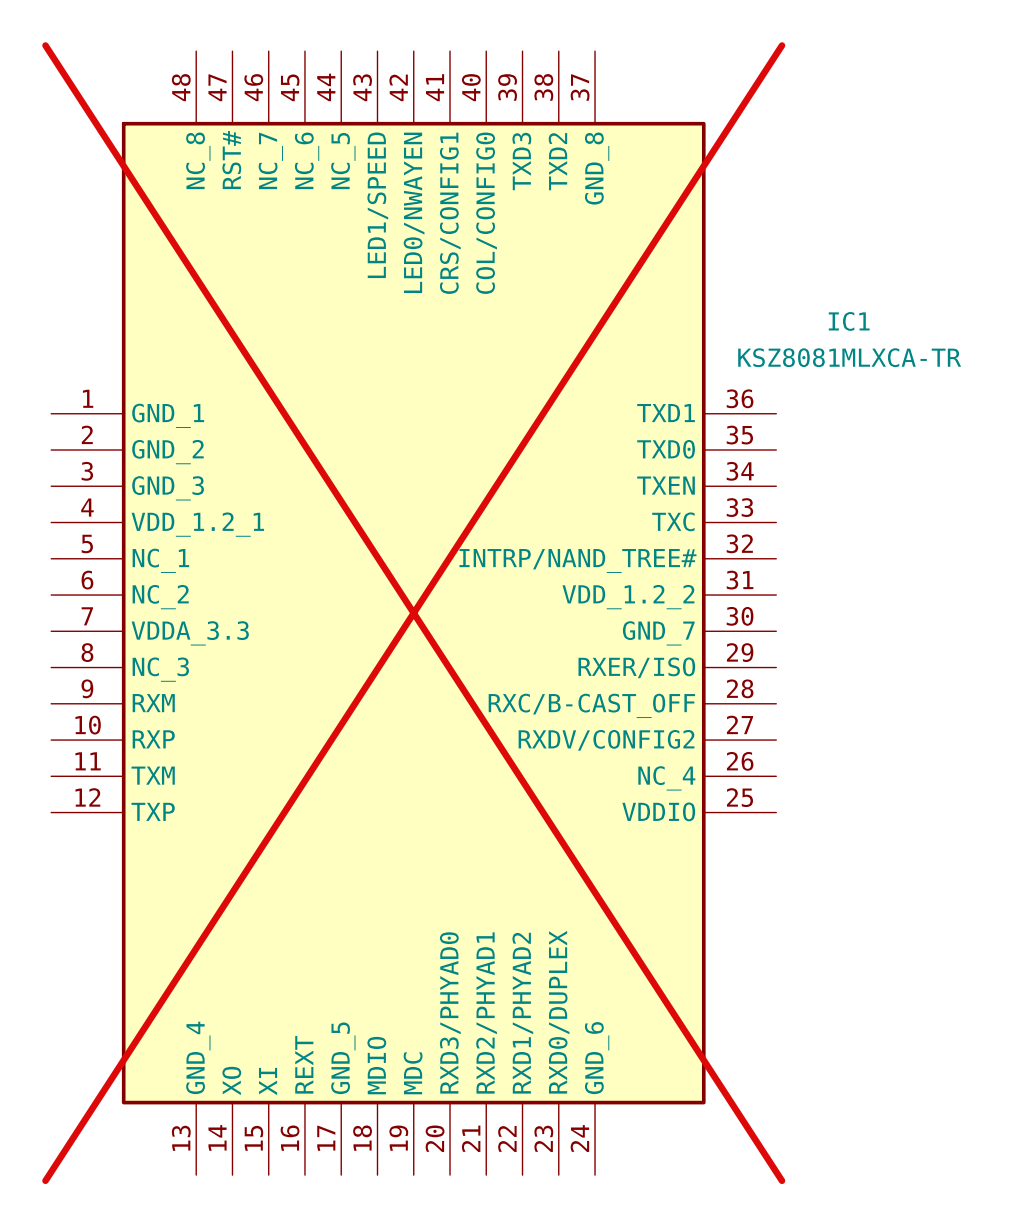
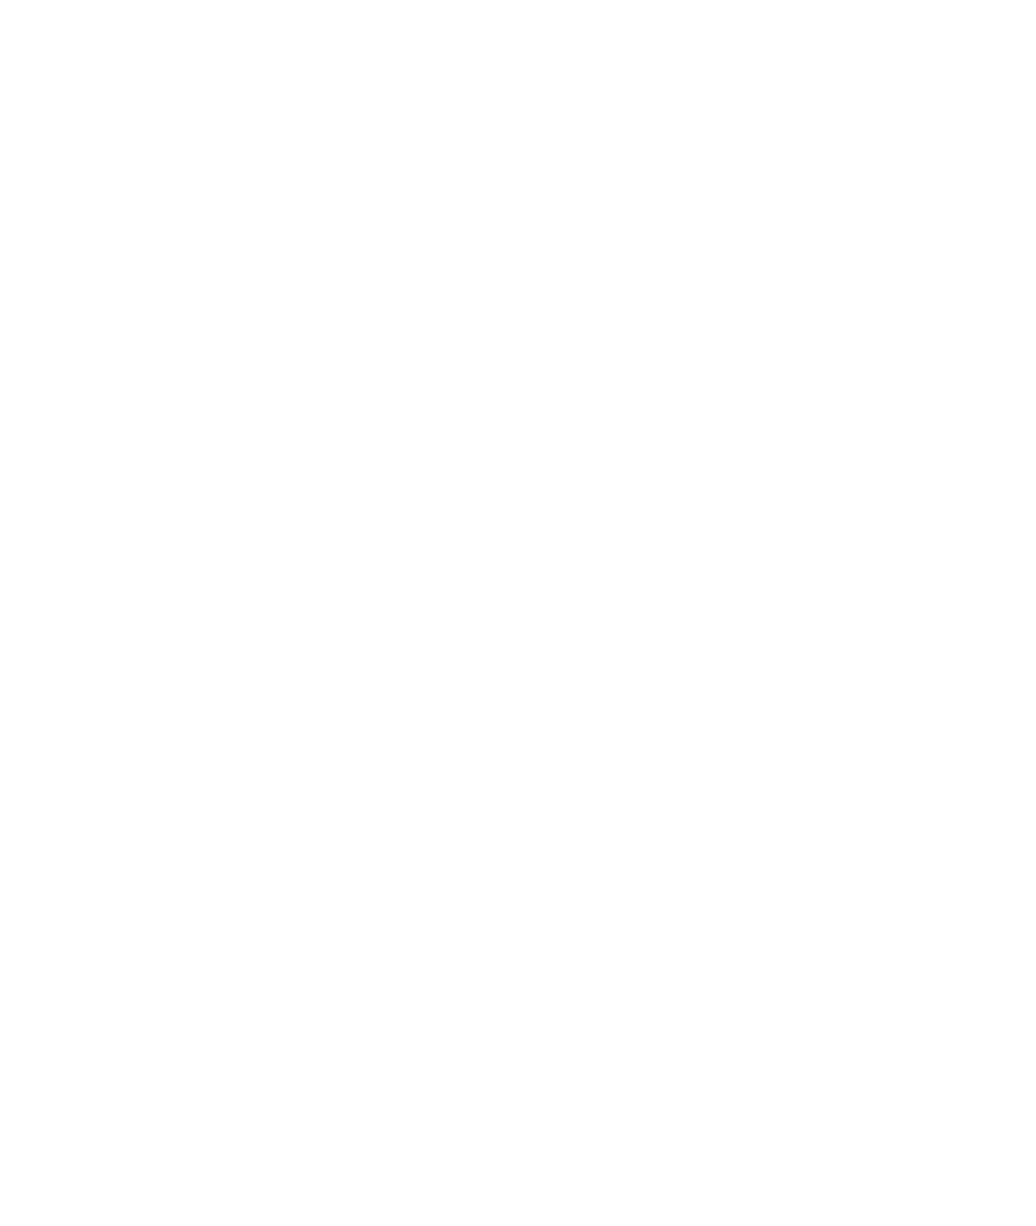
IC1: KSZ8081MLXCA-TR (413, 613) -> none

